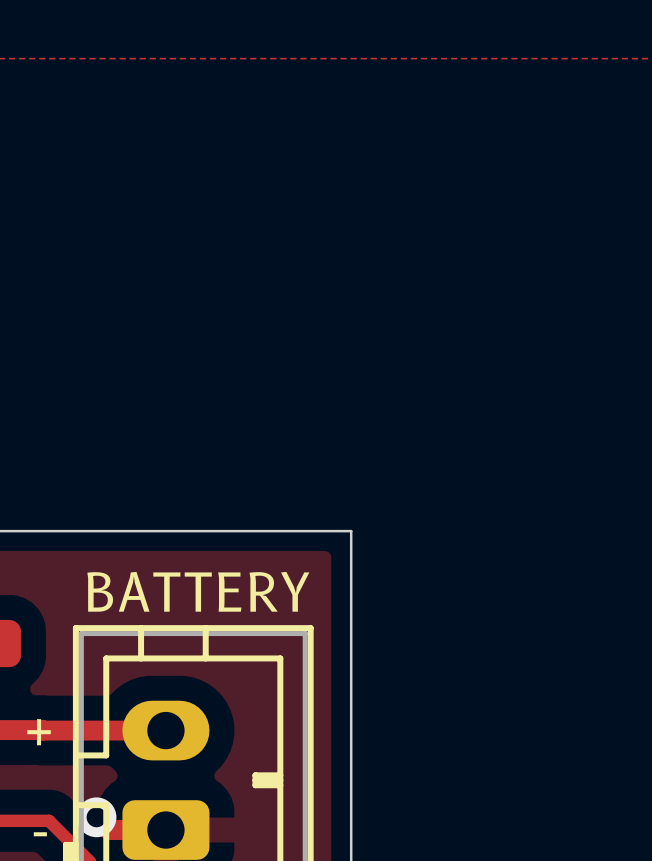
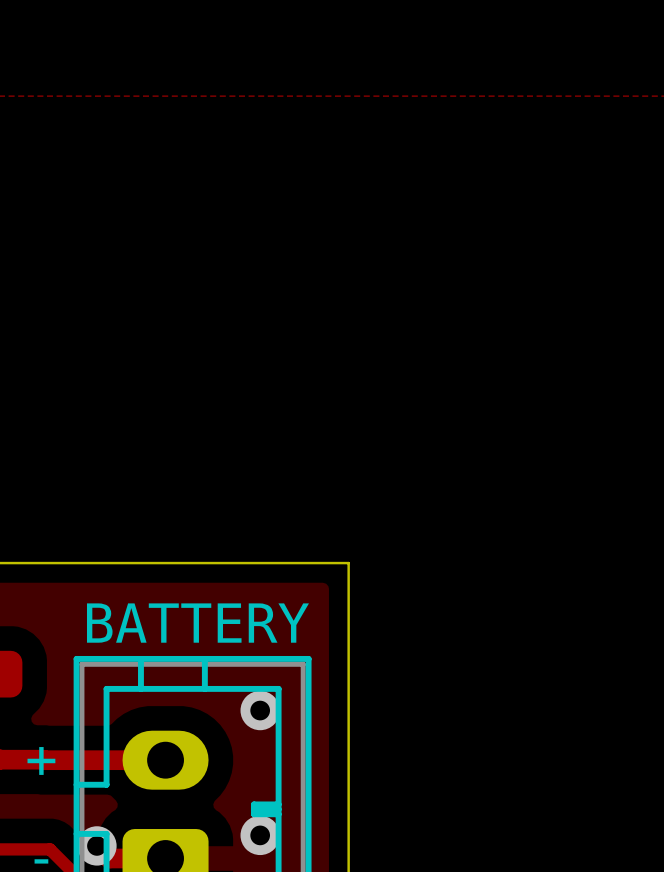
via: none -> (260, 710)
via: none -> (260, 835)

